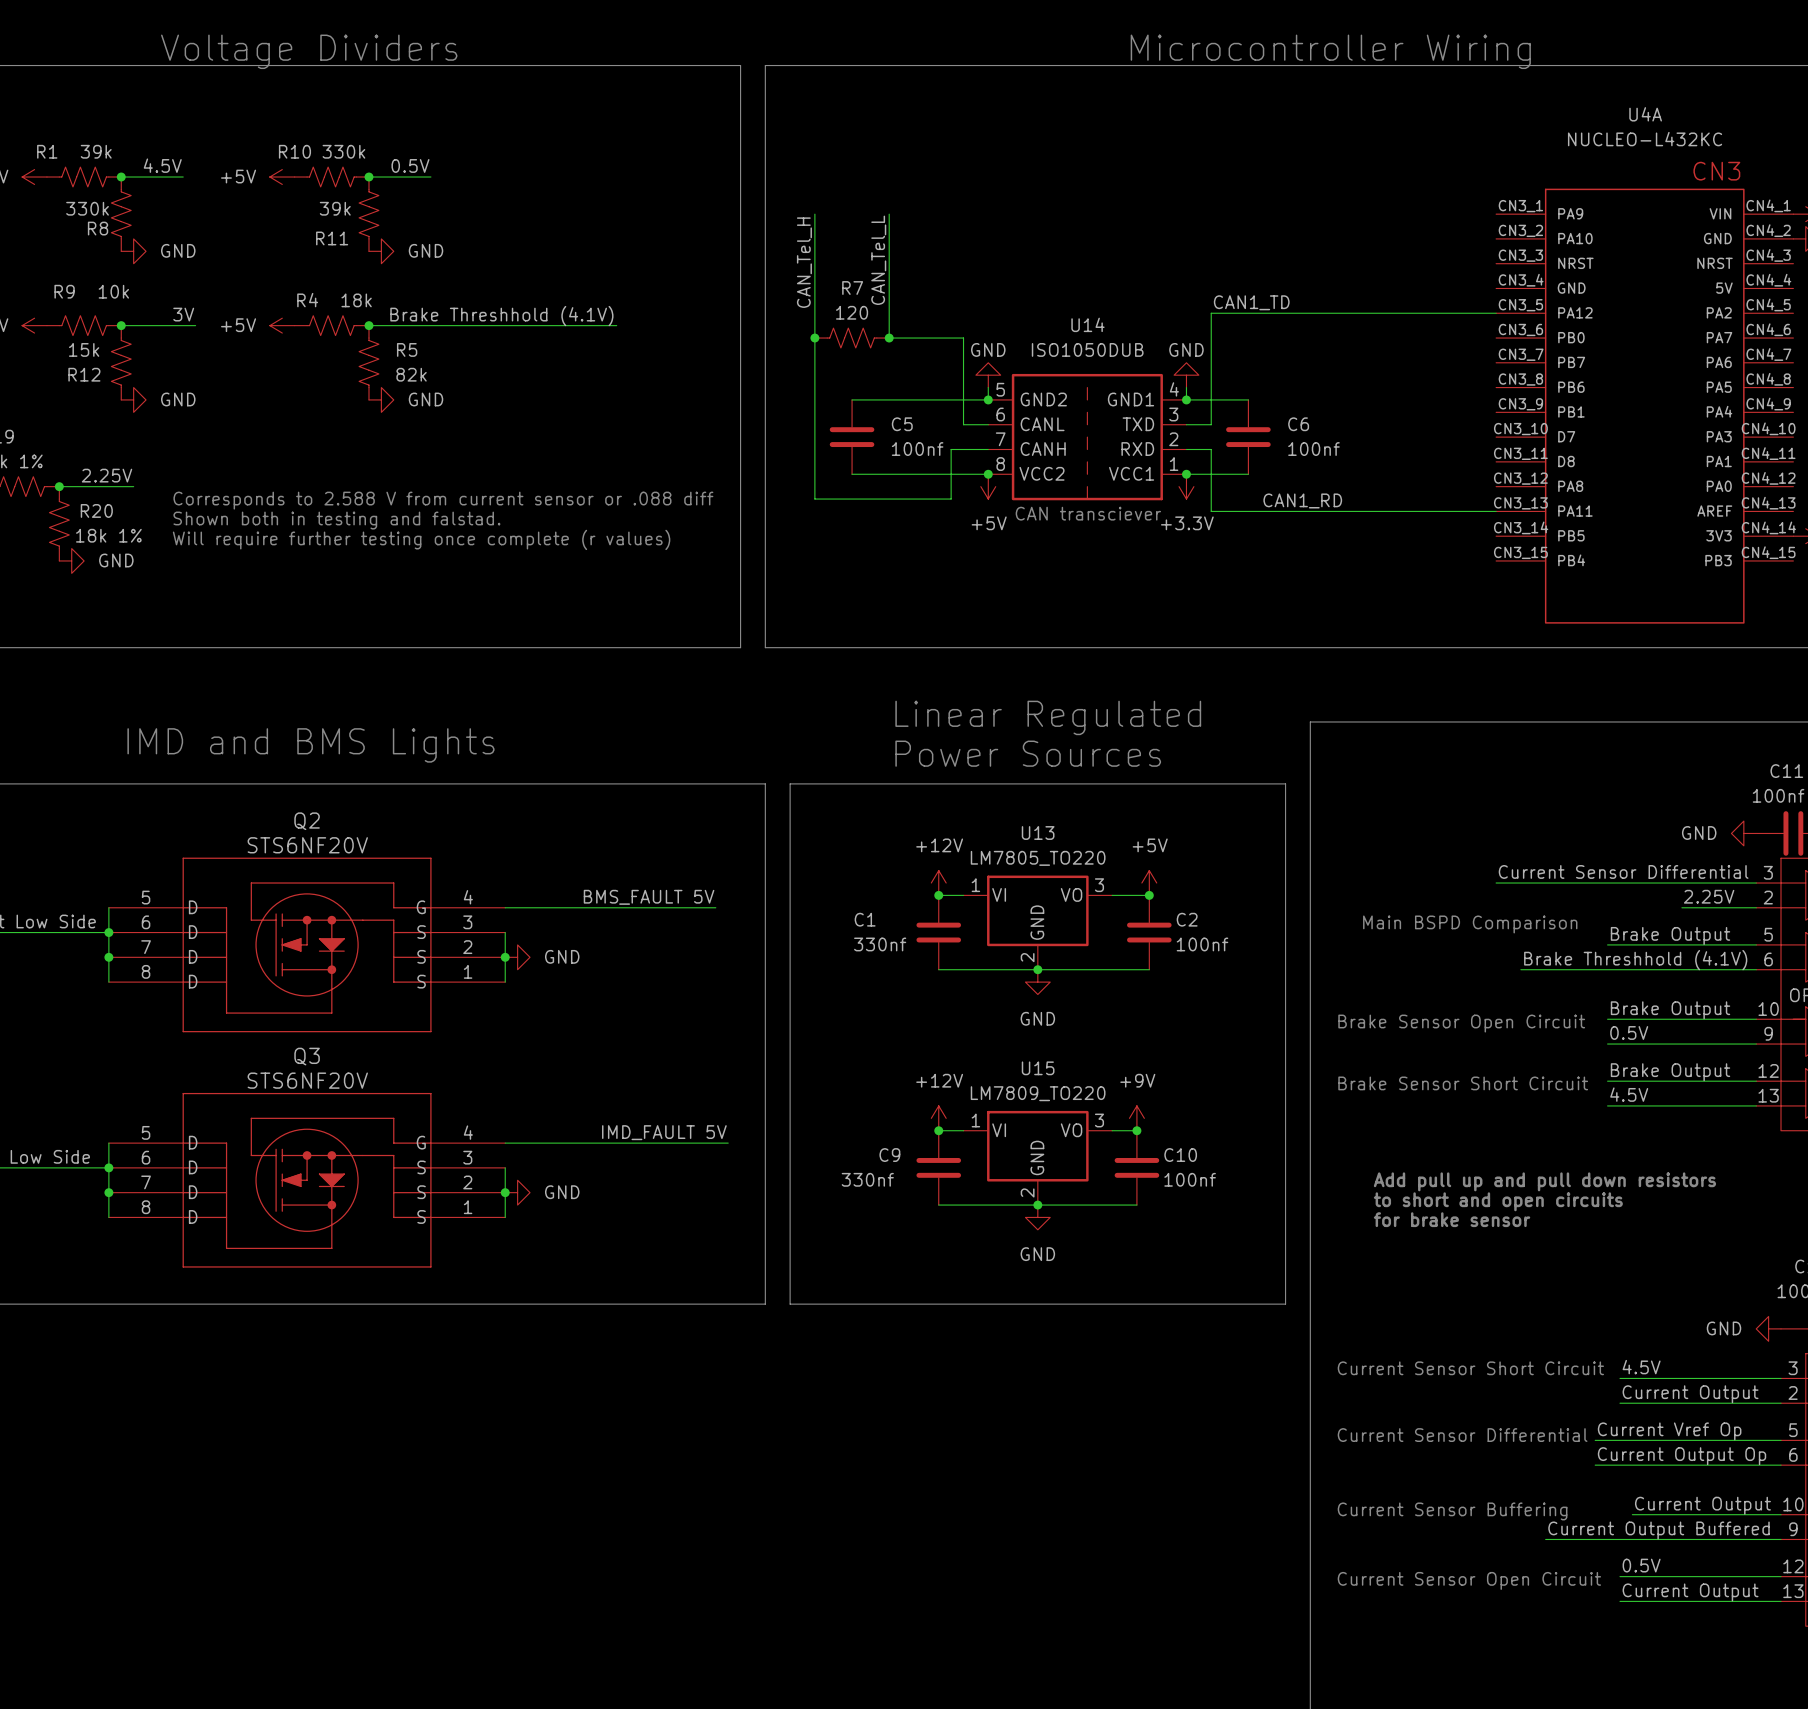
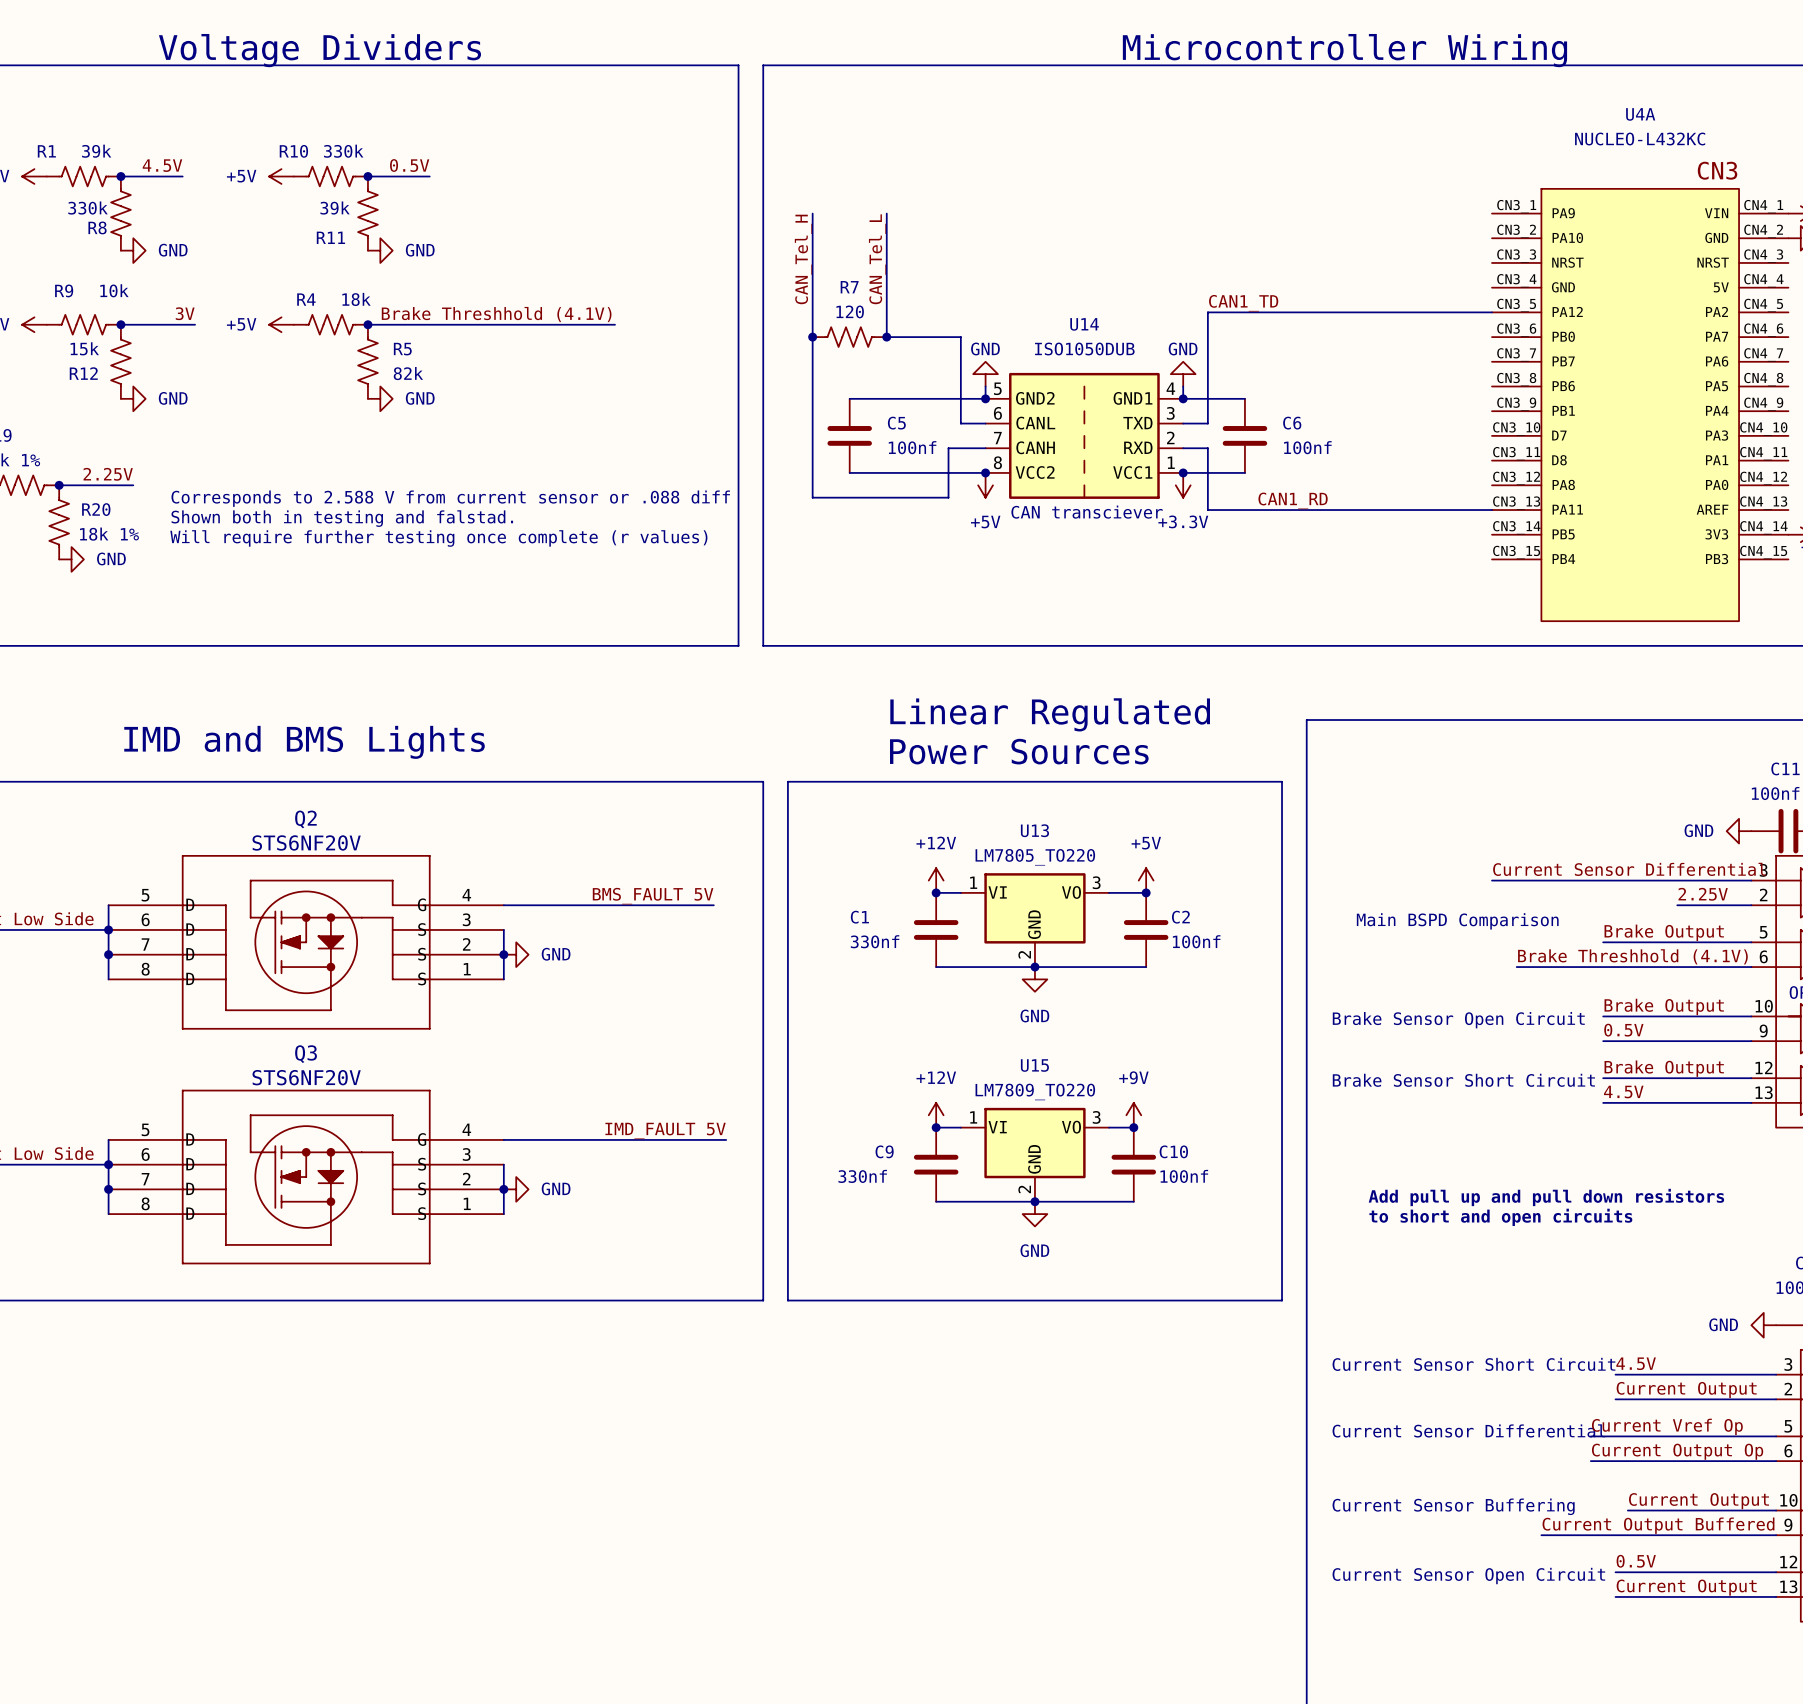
text: Add pull up and pull down resistors (1544, 1181) -> none
text: to short and open circuits (1498, 1201) -> Add pull up and pull down resistors (1546, 1197)
text: for brake sensor (1452, 1219) -> to short and open circuits (1500, 1217)

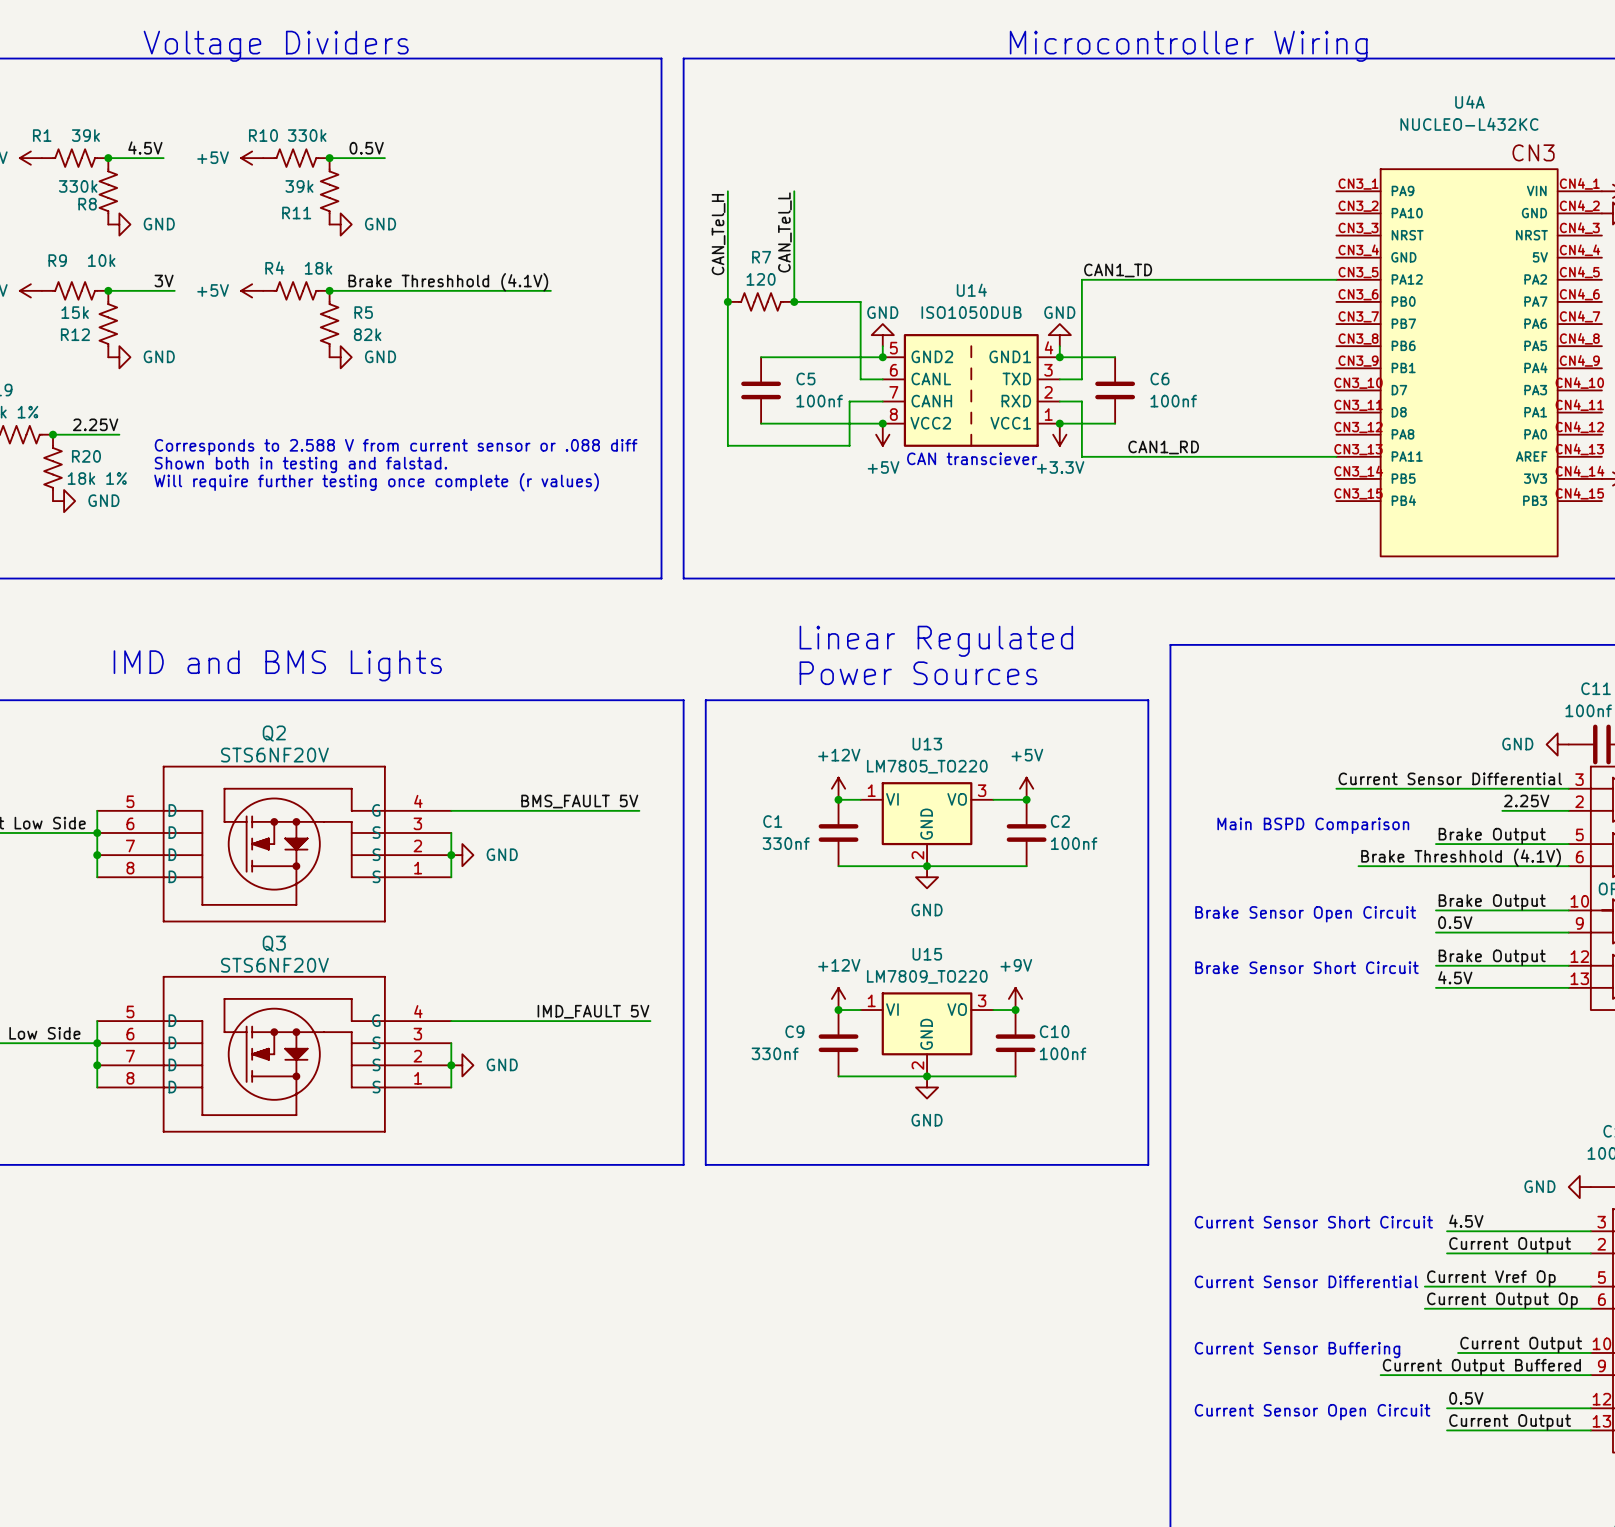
text: Add pull up and pull down resistors (1546, 1197) -> none
text: to short and open circuits (1500, 1217) -> none

